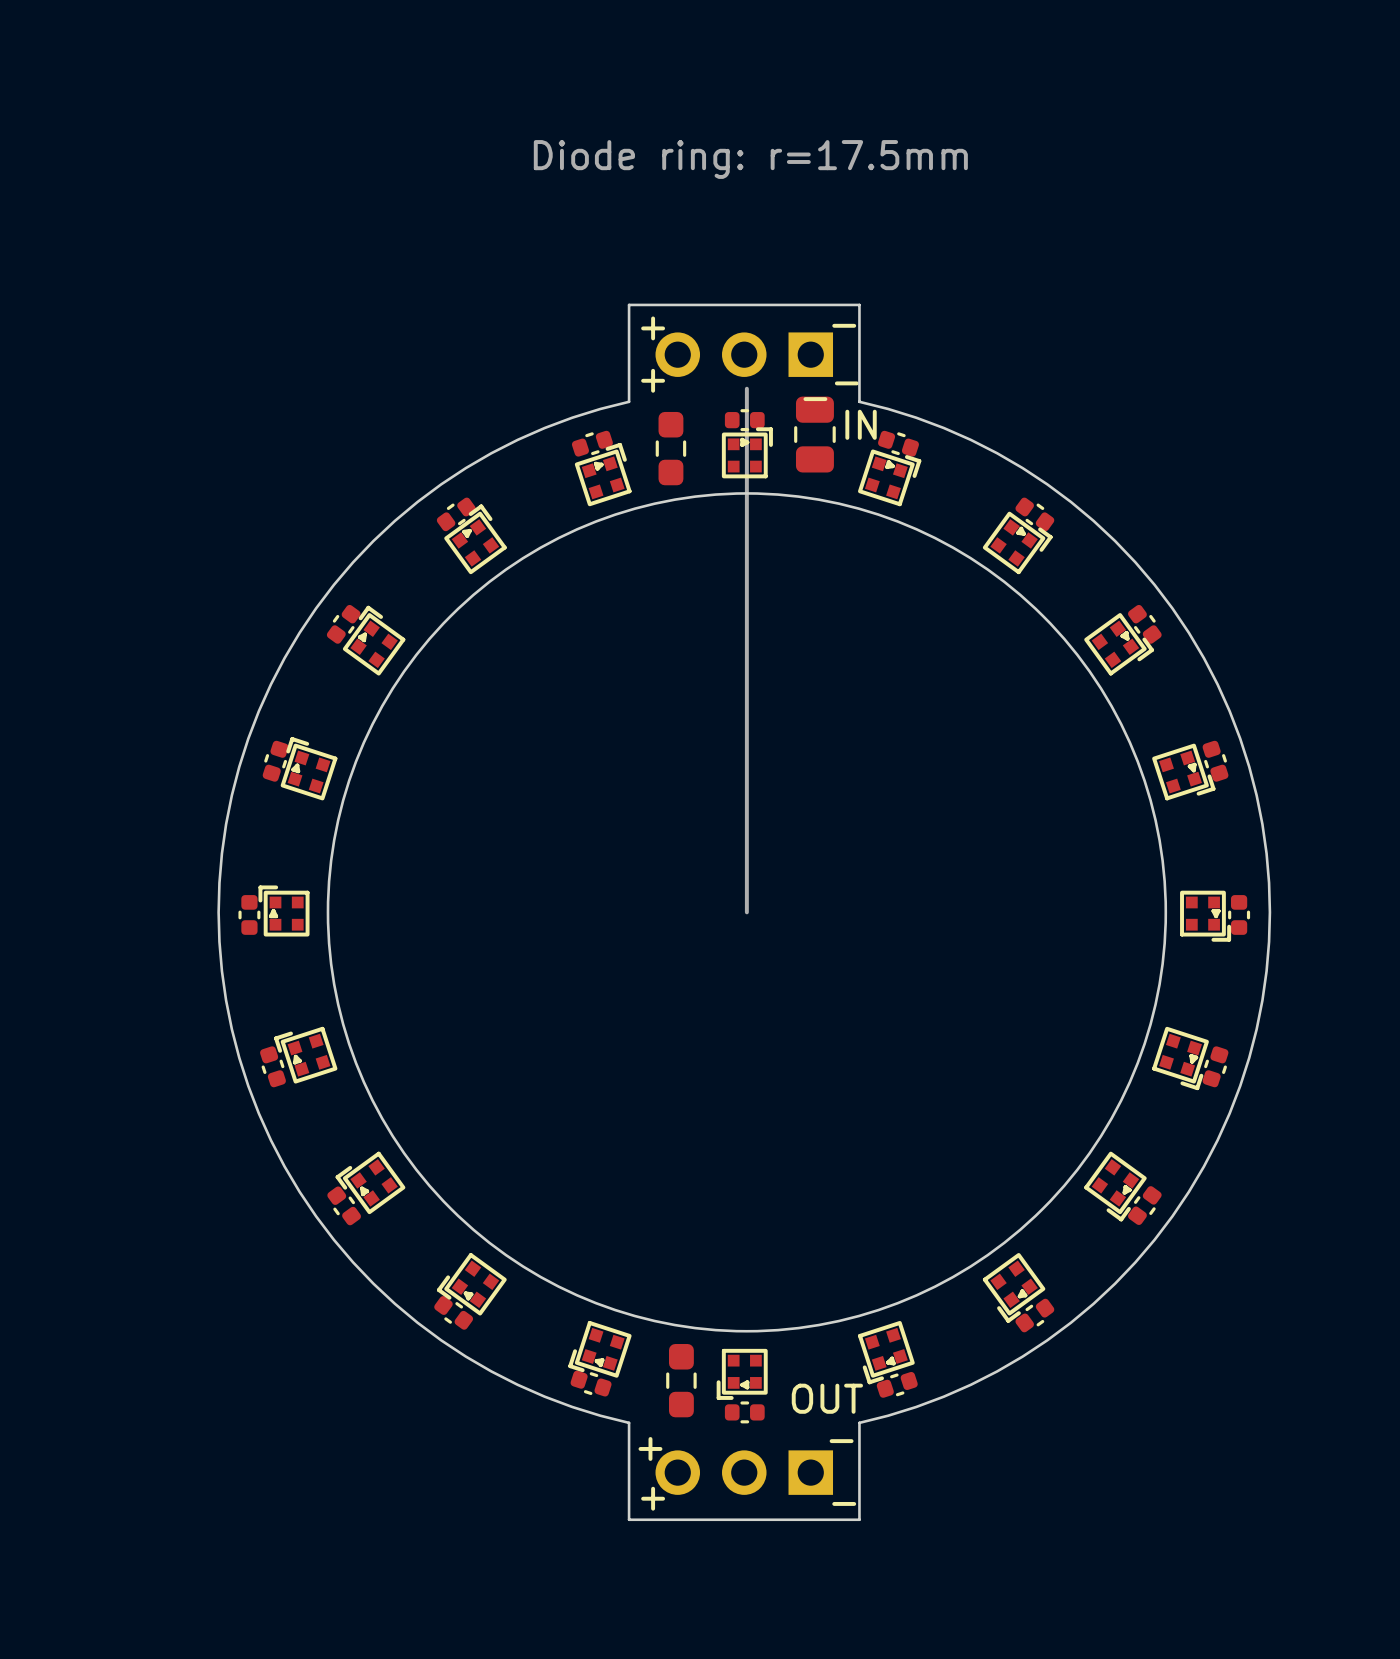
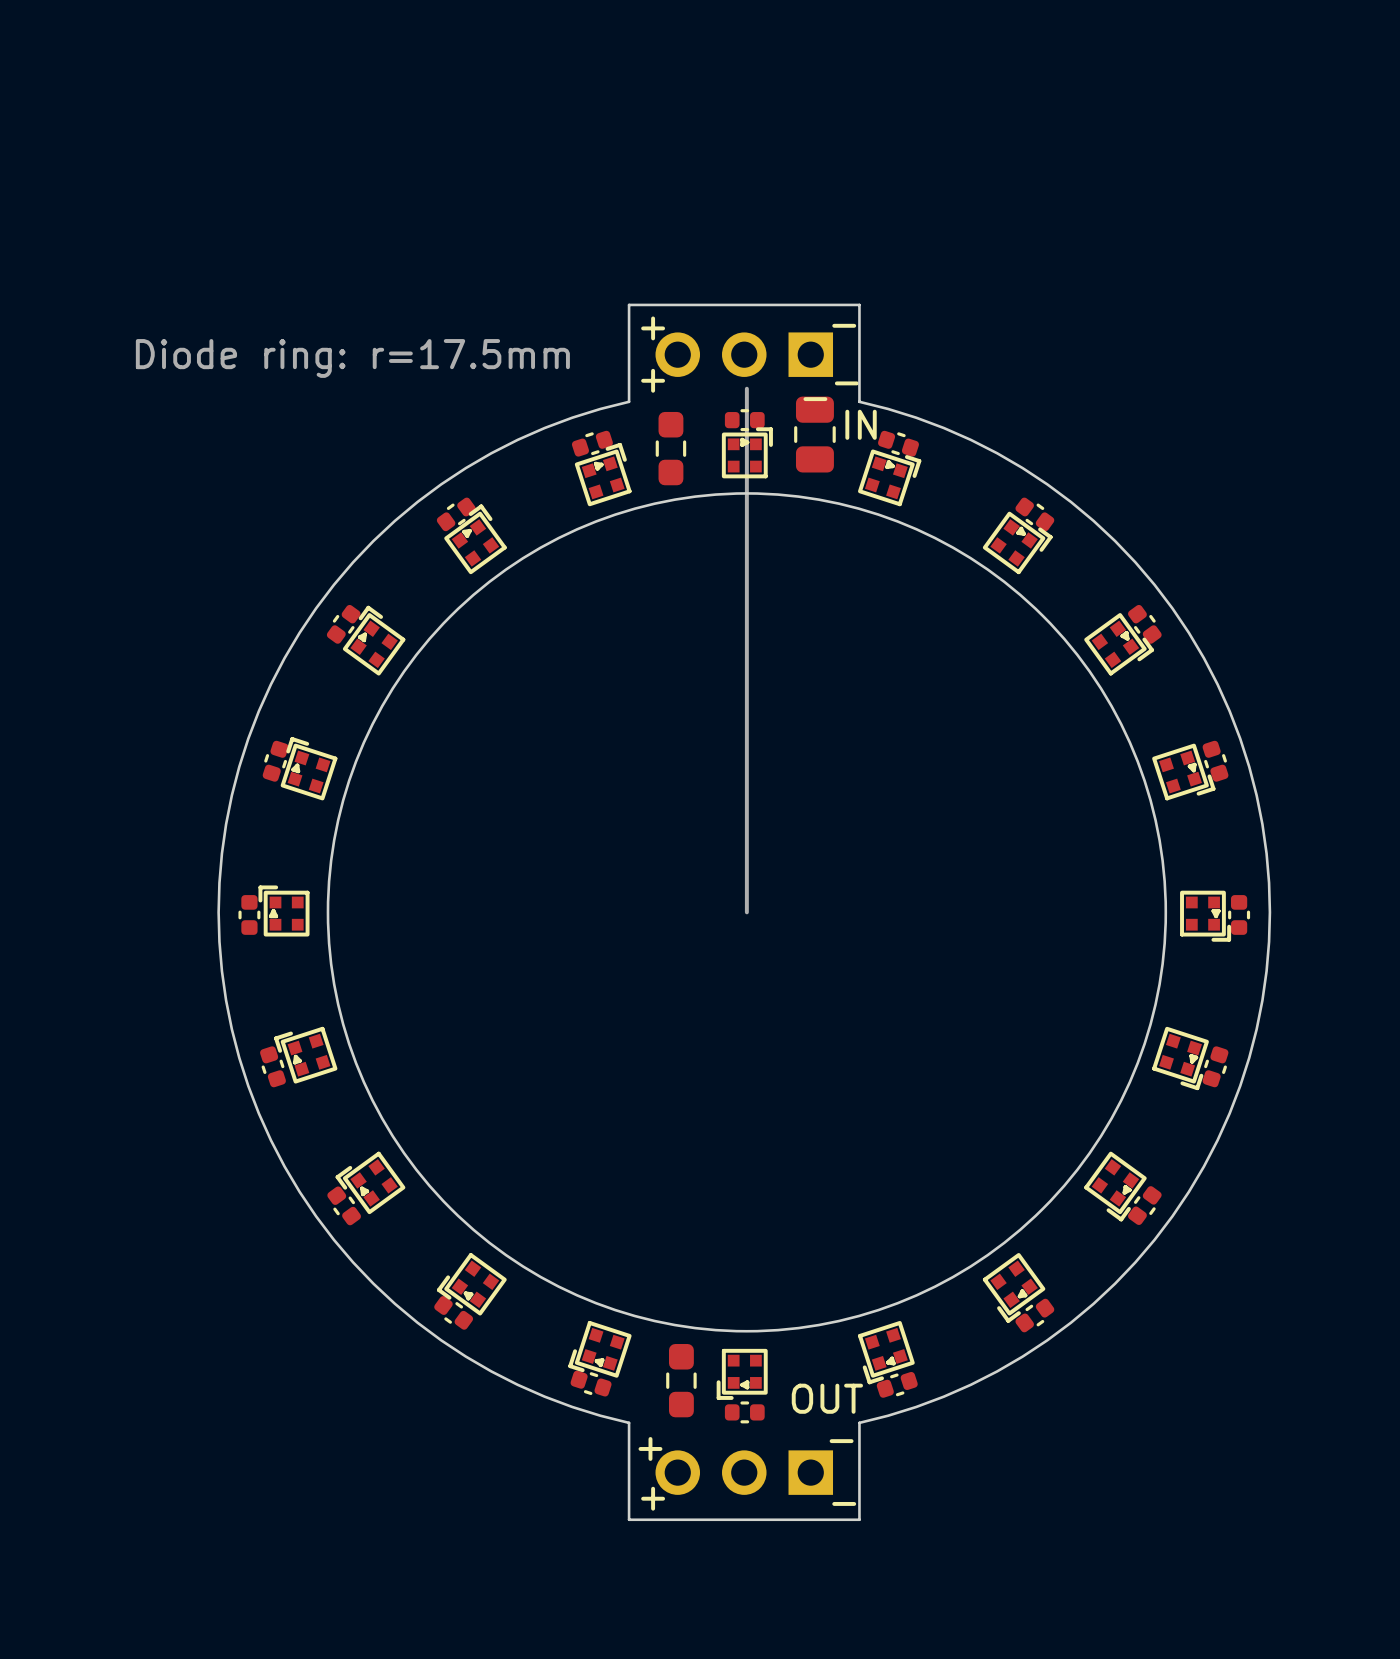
text position: Diode ring: r=17.5mm (750, 159) -> Diode ring: r=17.5mm (352, 358)

